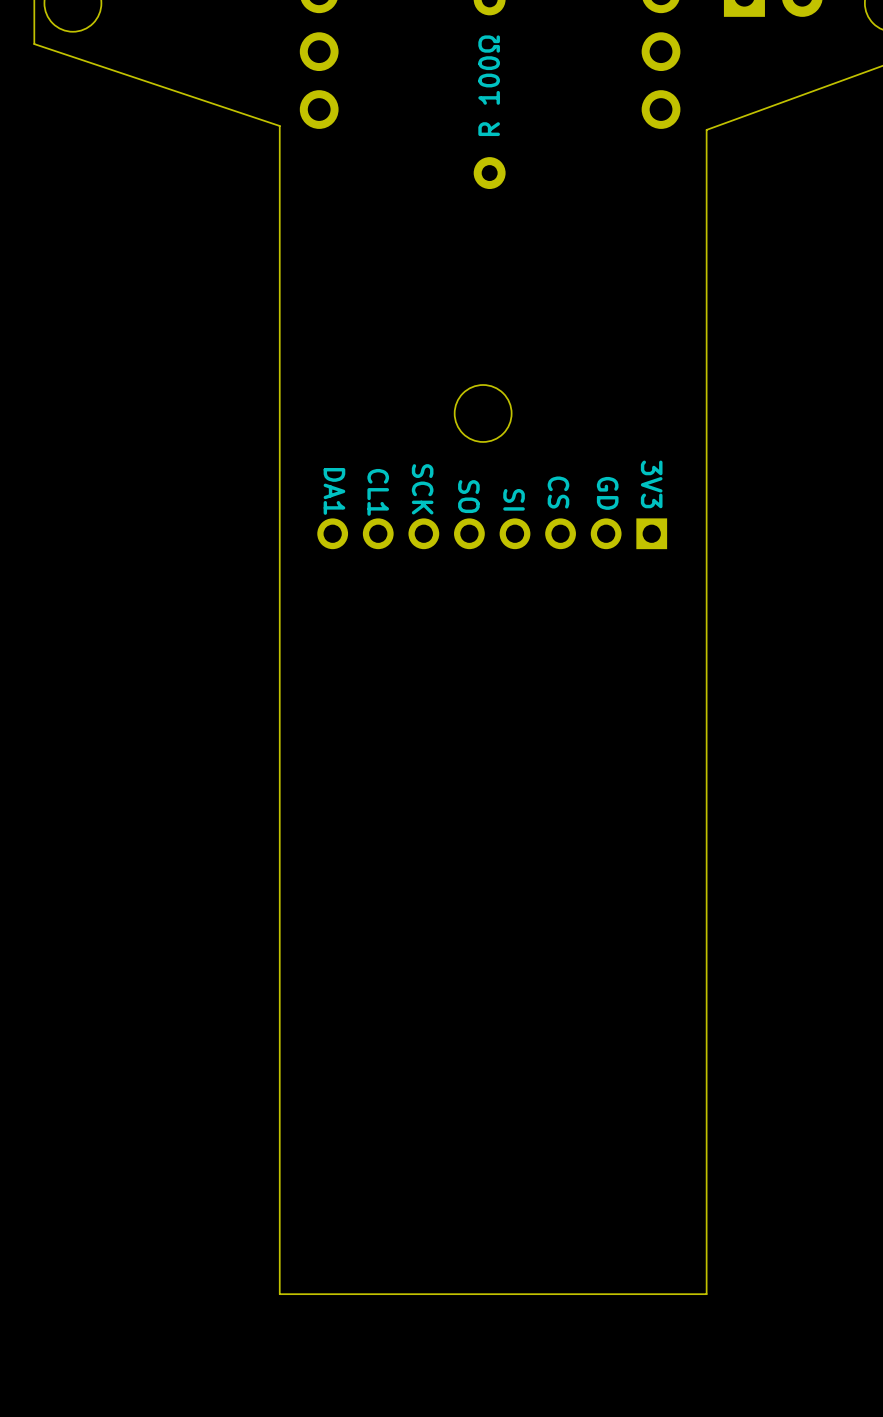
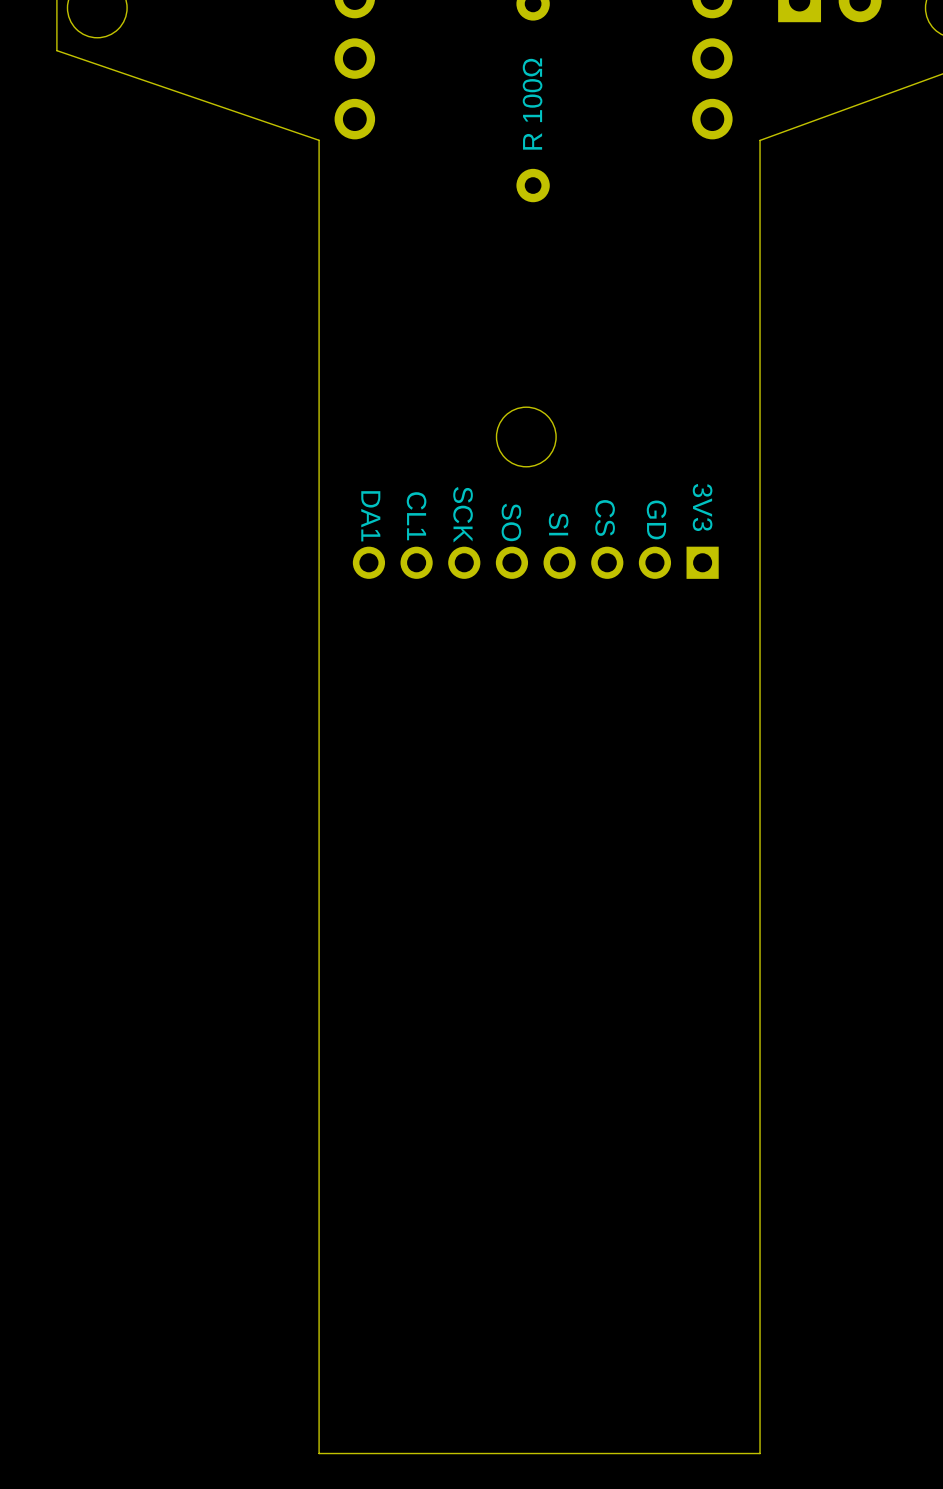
board edge: (34, 44) (279, 125) (279, 1294) (706, 1294) -> (56, 50) (319, 140) (319, 1453) (760, 1453) (760, 1358)

